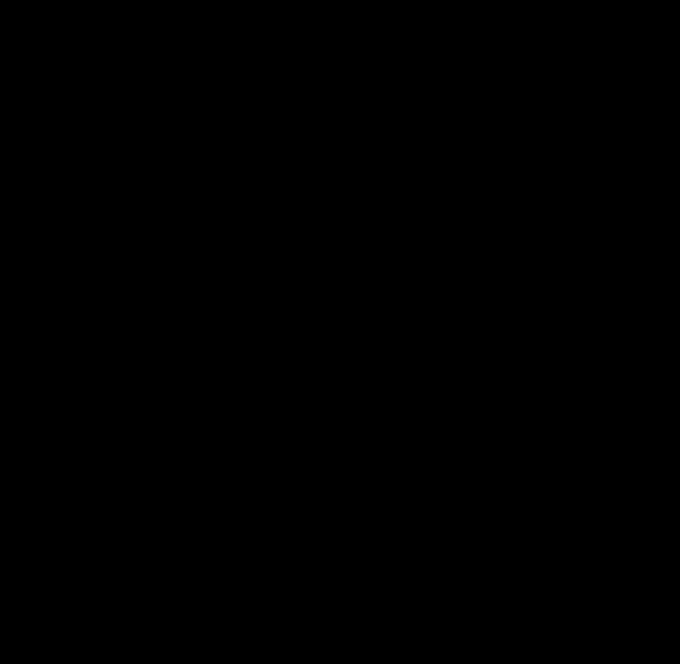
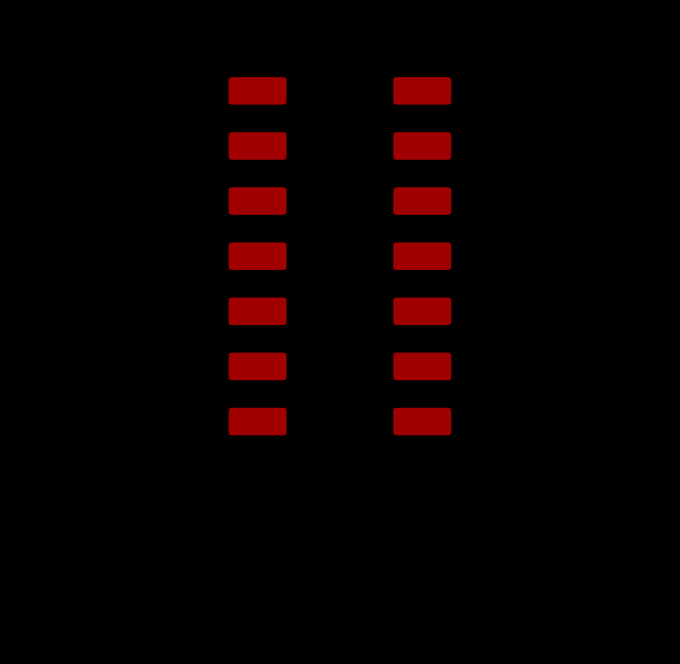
part: none -> (339, 256)

